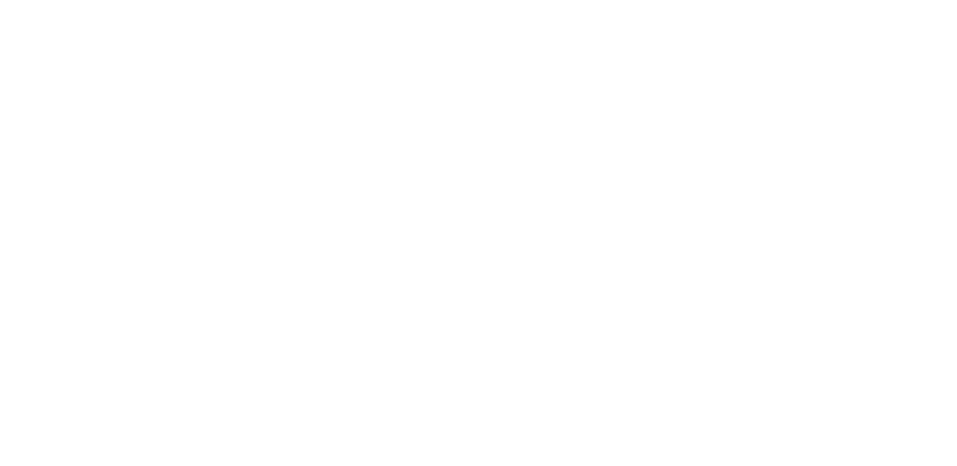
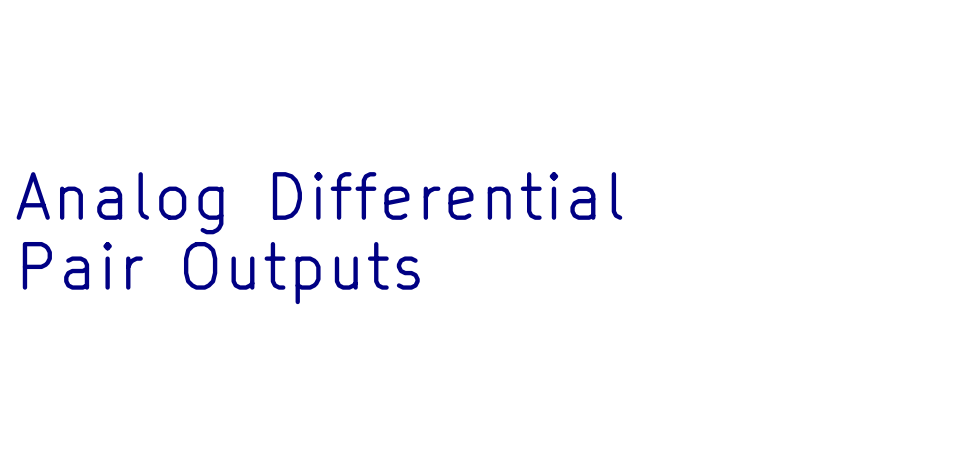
text: none -> Analog Differential (319, 203)
text: none -> Pair Outputs (221, 273)

